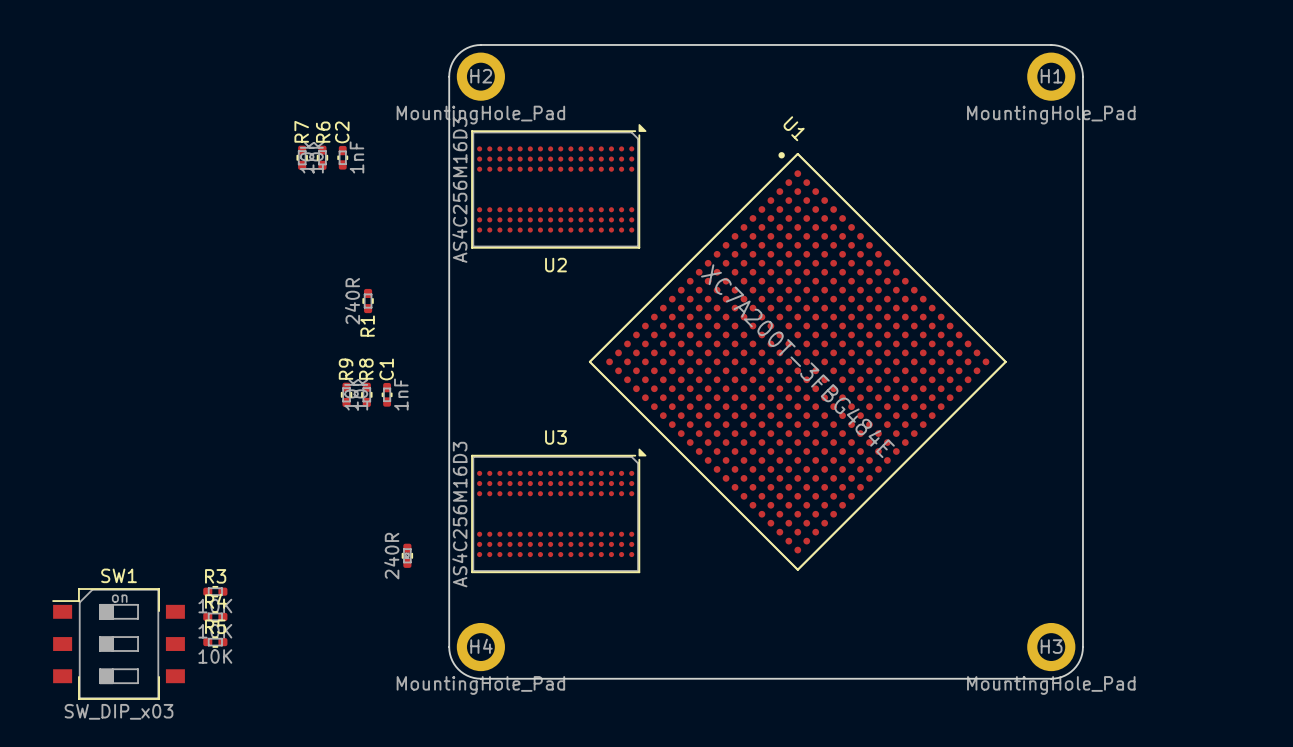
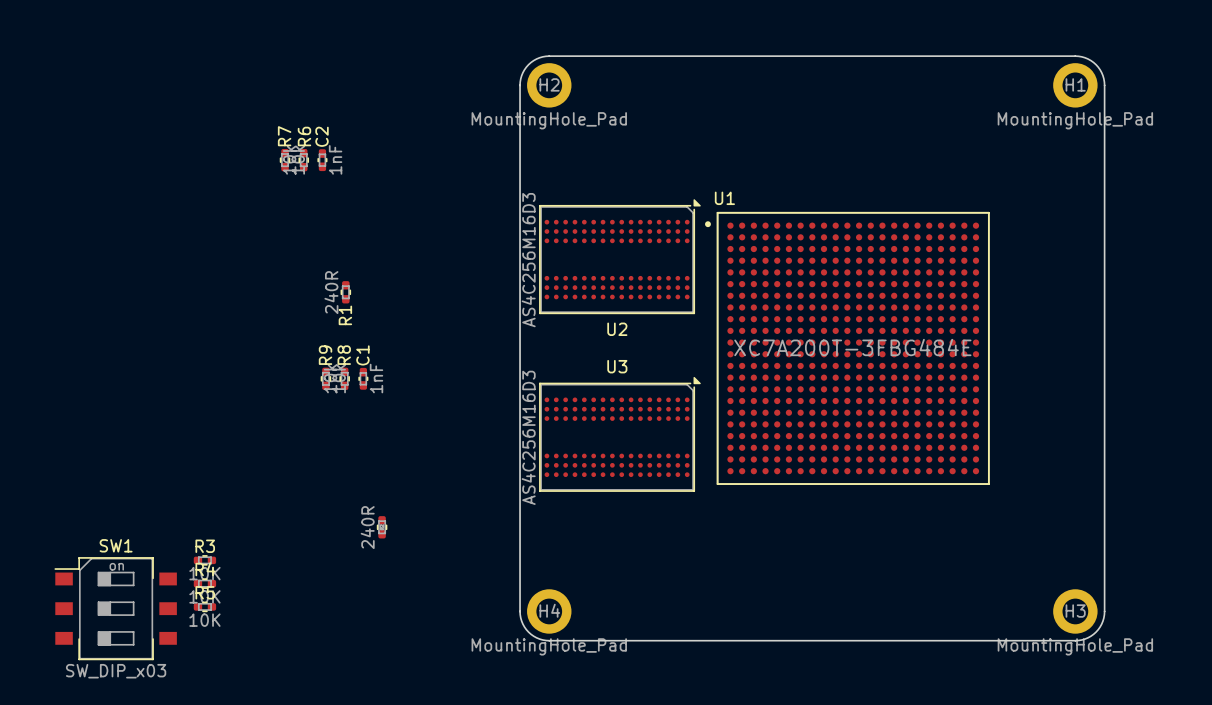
board edge: (588, 44) (473, 45) (464, 49) (456, 56) (450, 66) (449, 76) (450, 654) (458, 669) (473, 677) (588, 678) -> (549, 56) (536, 59) (528, 64) (521, 75) (520, 85) (520, 611) (521, 621) (528, 632) (536, 637) (549, 640)
board edge: (1051, 44) (1065, 48) (1073, 54) (1079, 62) (1082, 76) (1082, 647) (1081, 657) (1073, 669) (1061, 676) (1051, 678) -> (975, 56) (1081, 56) (1090, 60) (1098, 67) (1102, 75) (1104, 85) (1103, 617) (1096, 632) (1081, 639) (975, 640)
H2 position: (480, 76) -> (549, 85)
H1 position: (1051, 76) -> (1075, 85)
U1 name position: U1 (794, 128) -> U1 (724, 198)
U2 position: (558, 186) -> (619, 256)
U1 rotation: 0° (797, 361) -> 45° counterclockwise (847, 348)
U3 position: (558, 510) -> (619, 434)
H4 position: (480, 647) -> (549, 611)
H3 position: (1051, 647) -> (1075, 611)

